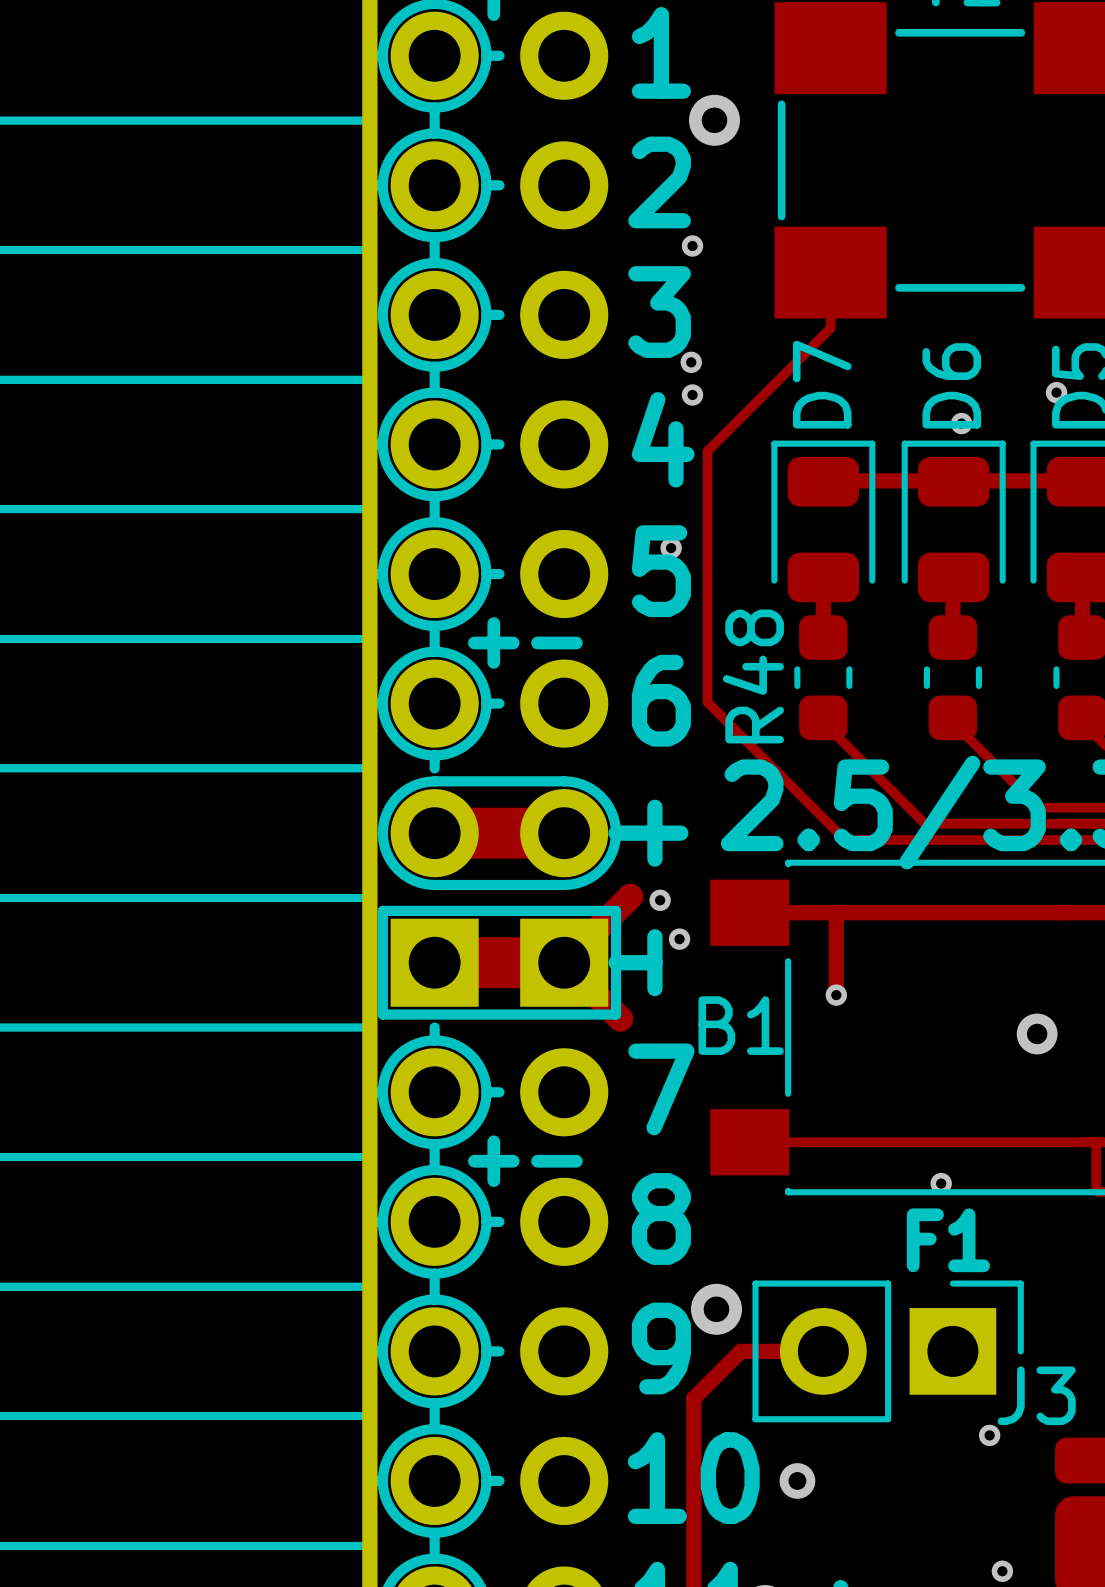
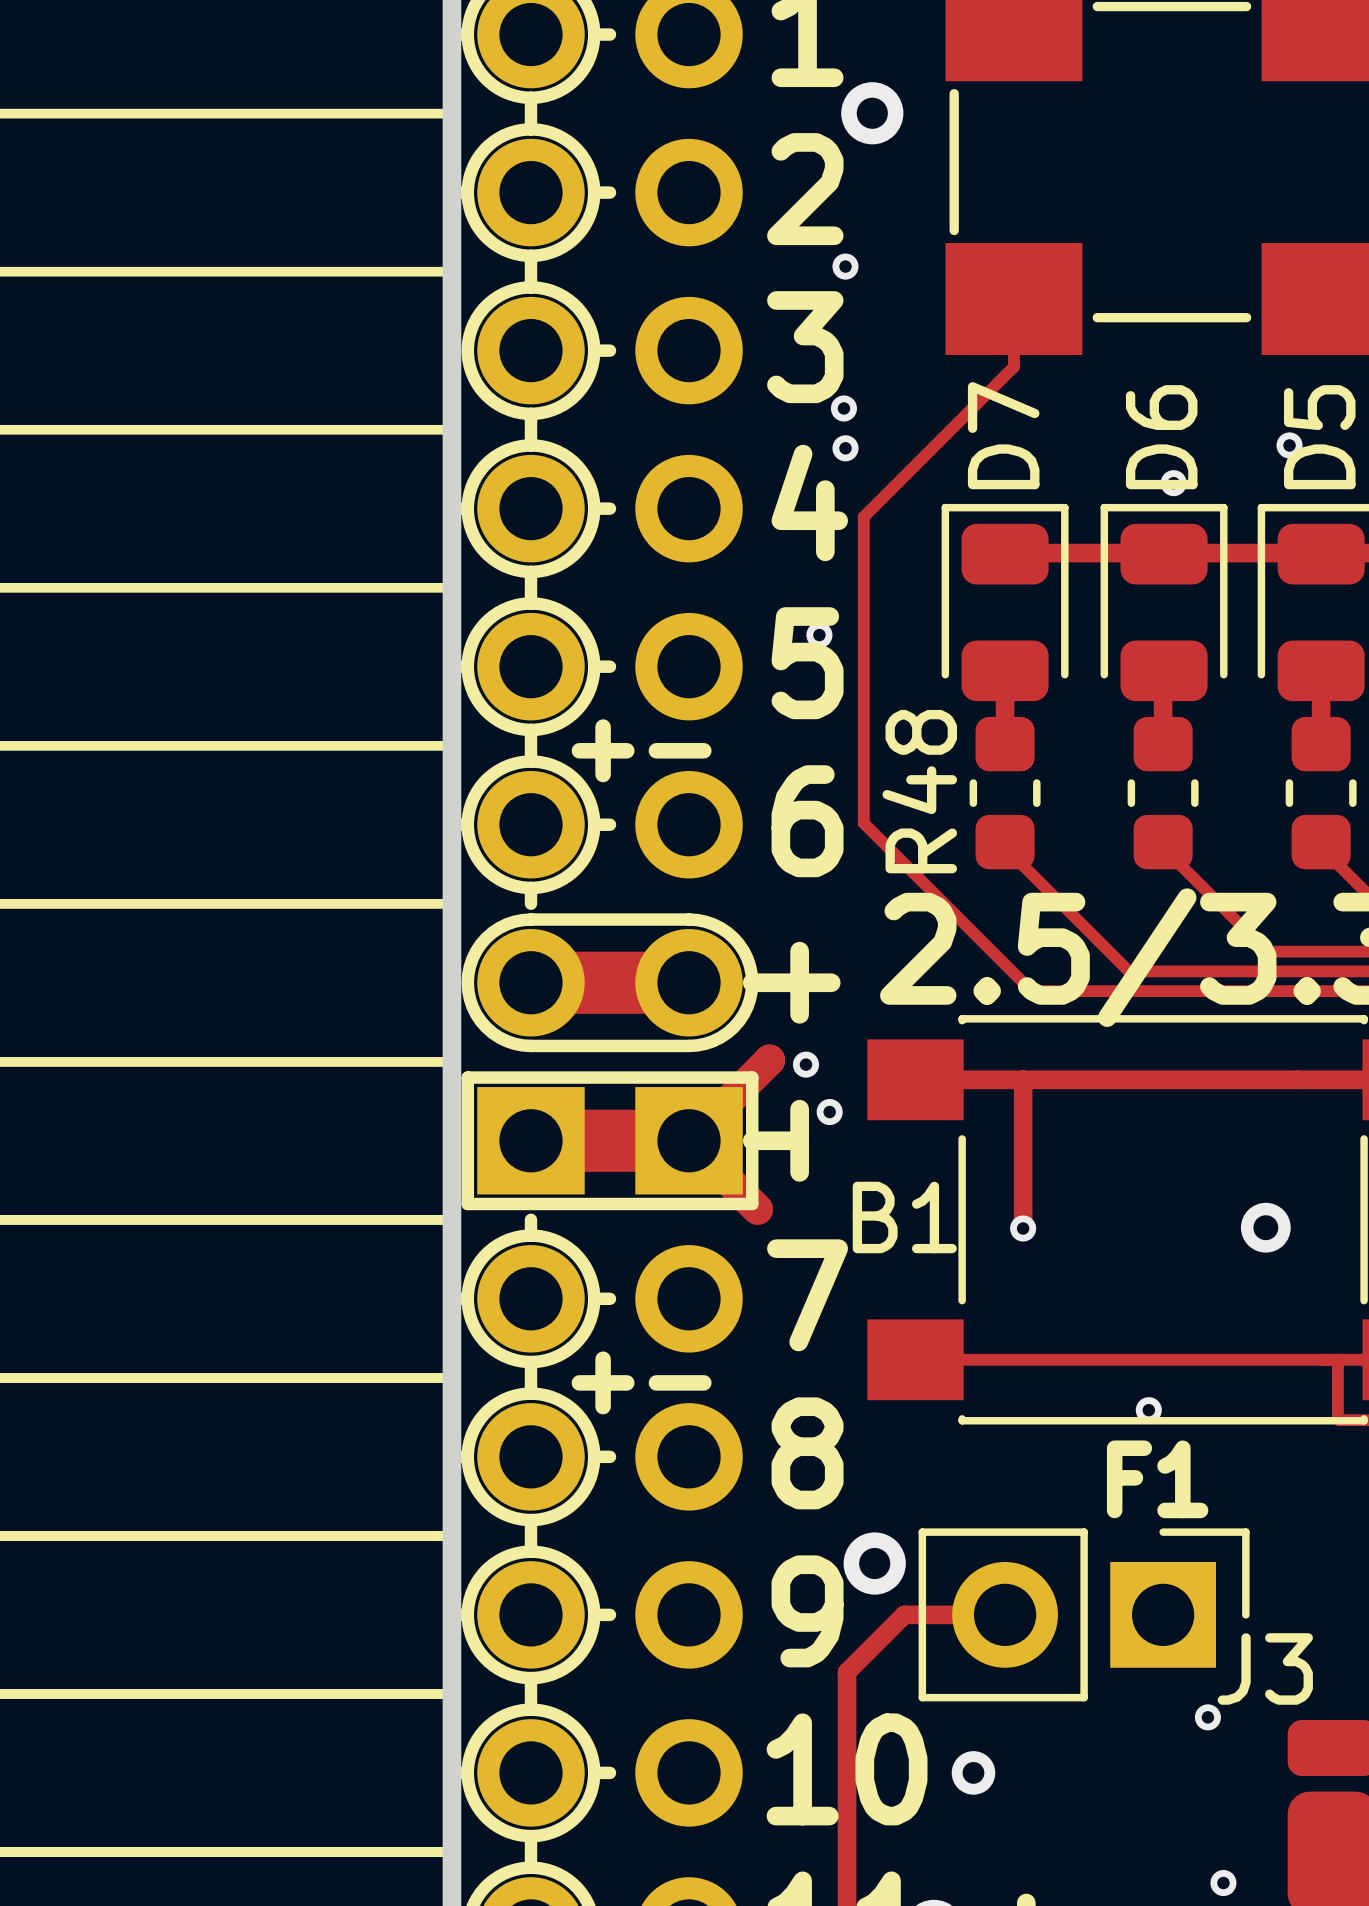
track: (838, 912) (836, 914) (836, 995) -> (1023, 1079) (1023, 1228)
via position: (836, 995) -> (1023, 1228)

